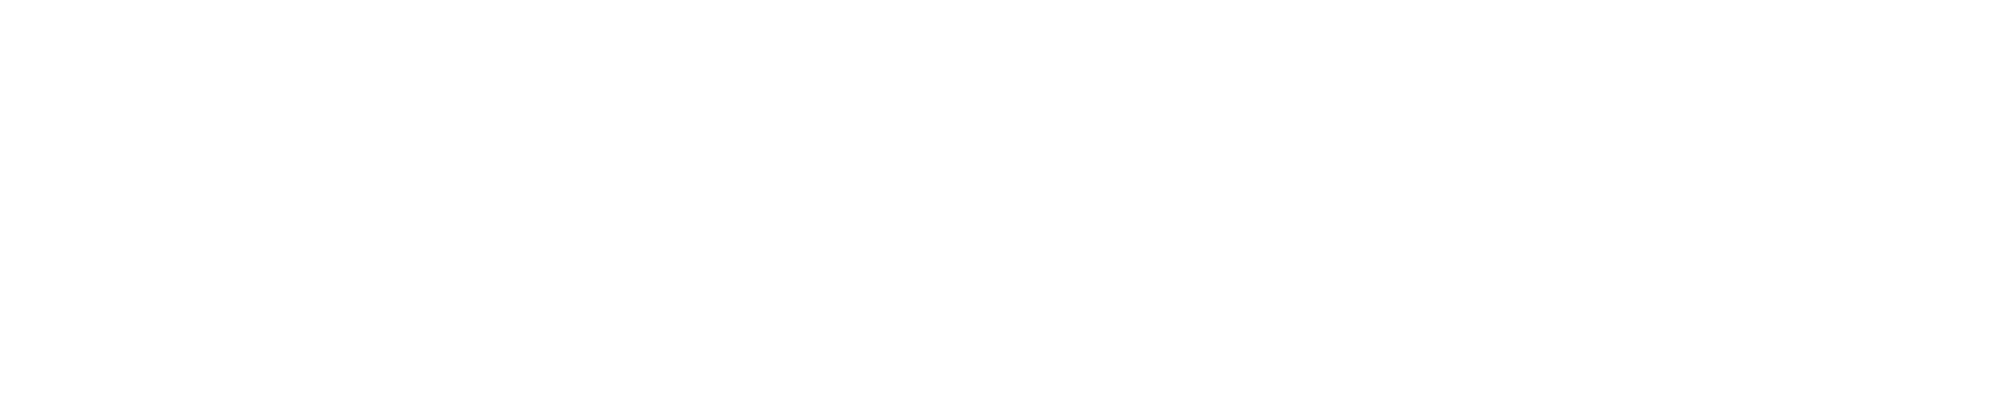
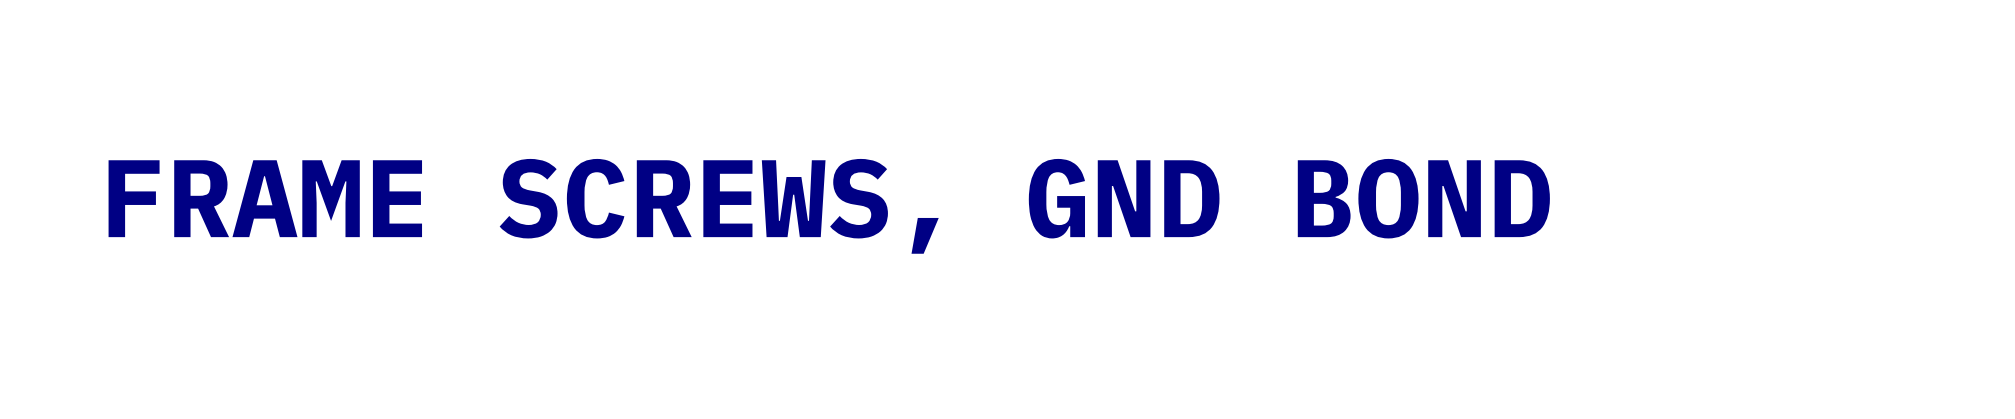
text: none -> FRAME SCREWS, GND BOND (829, 206)

